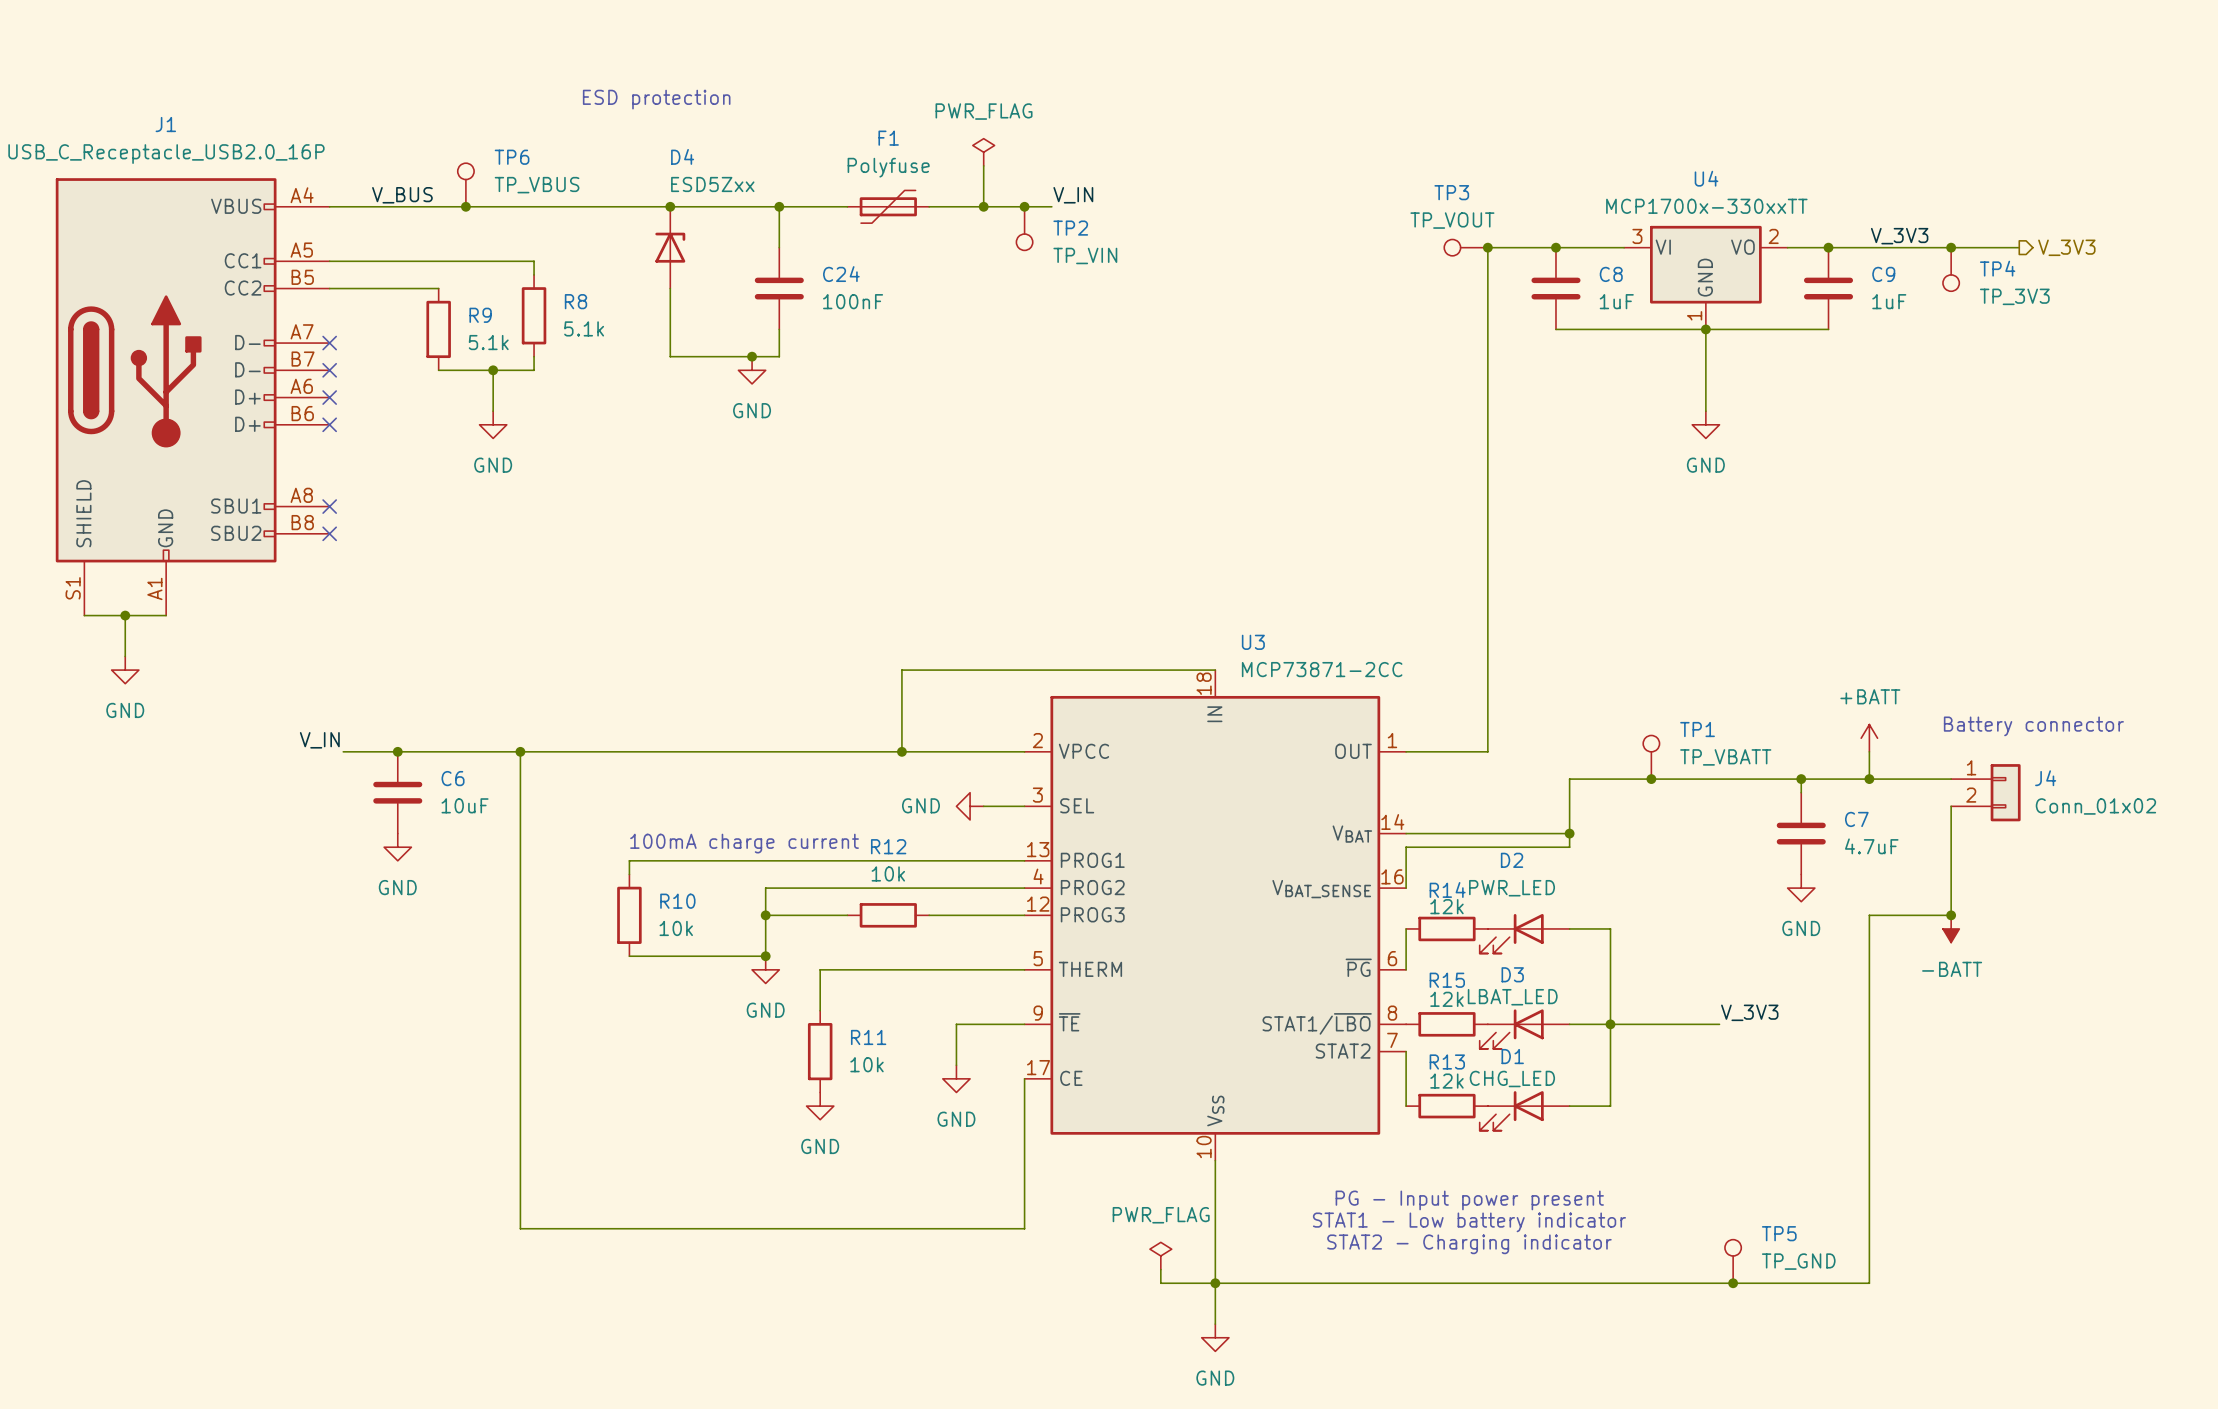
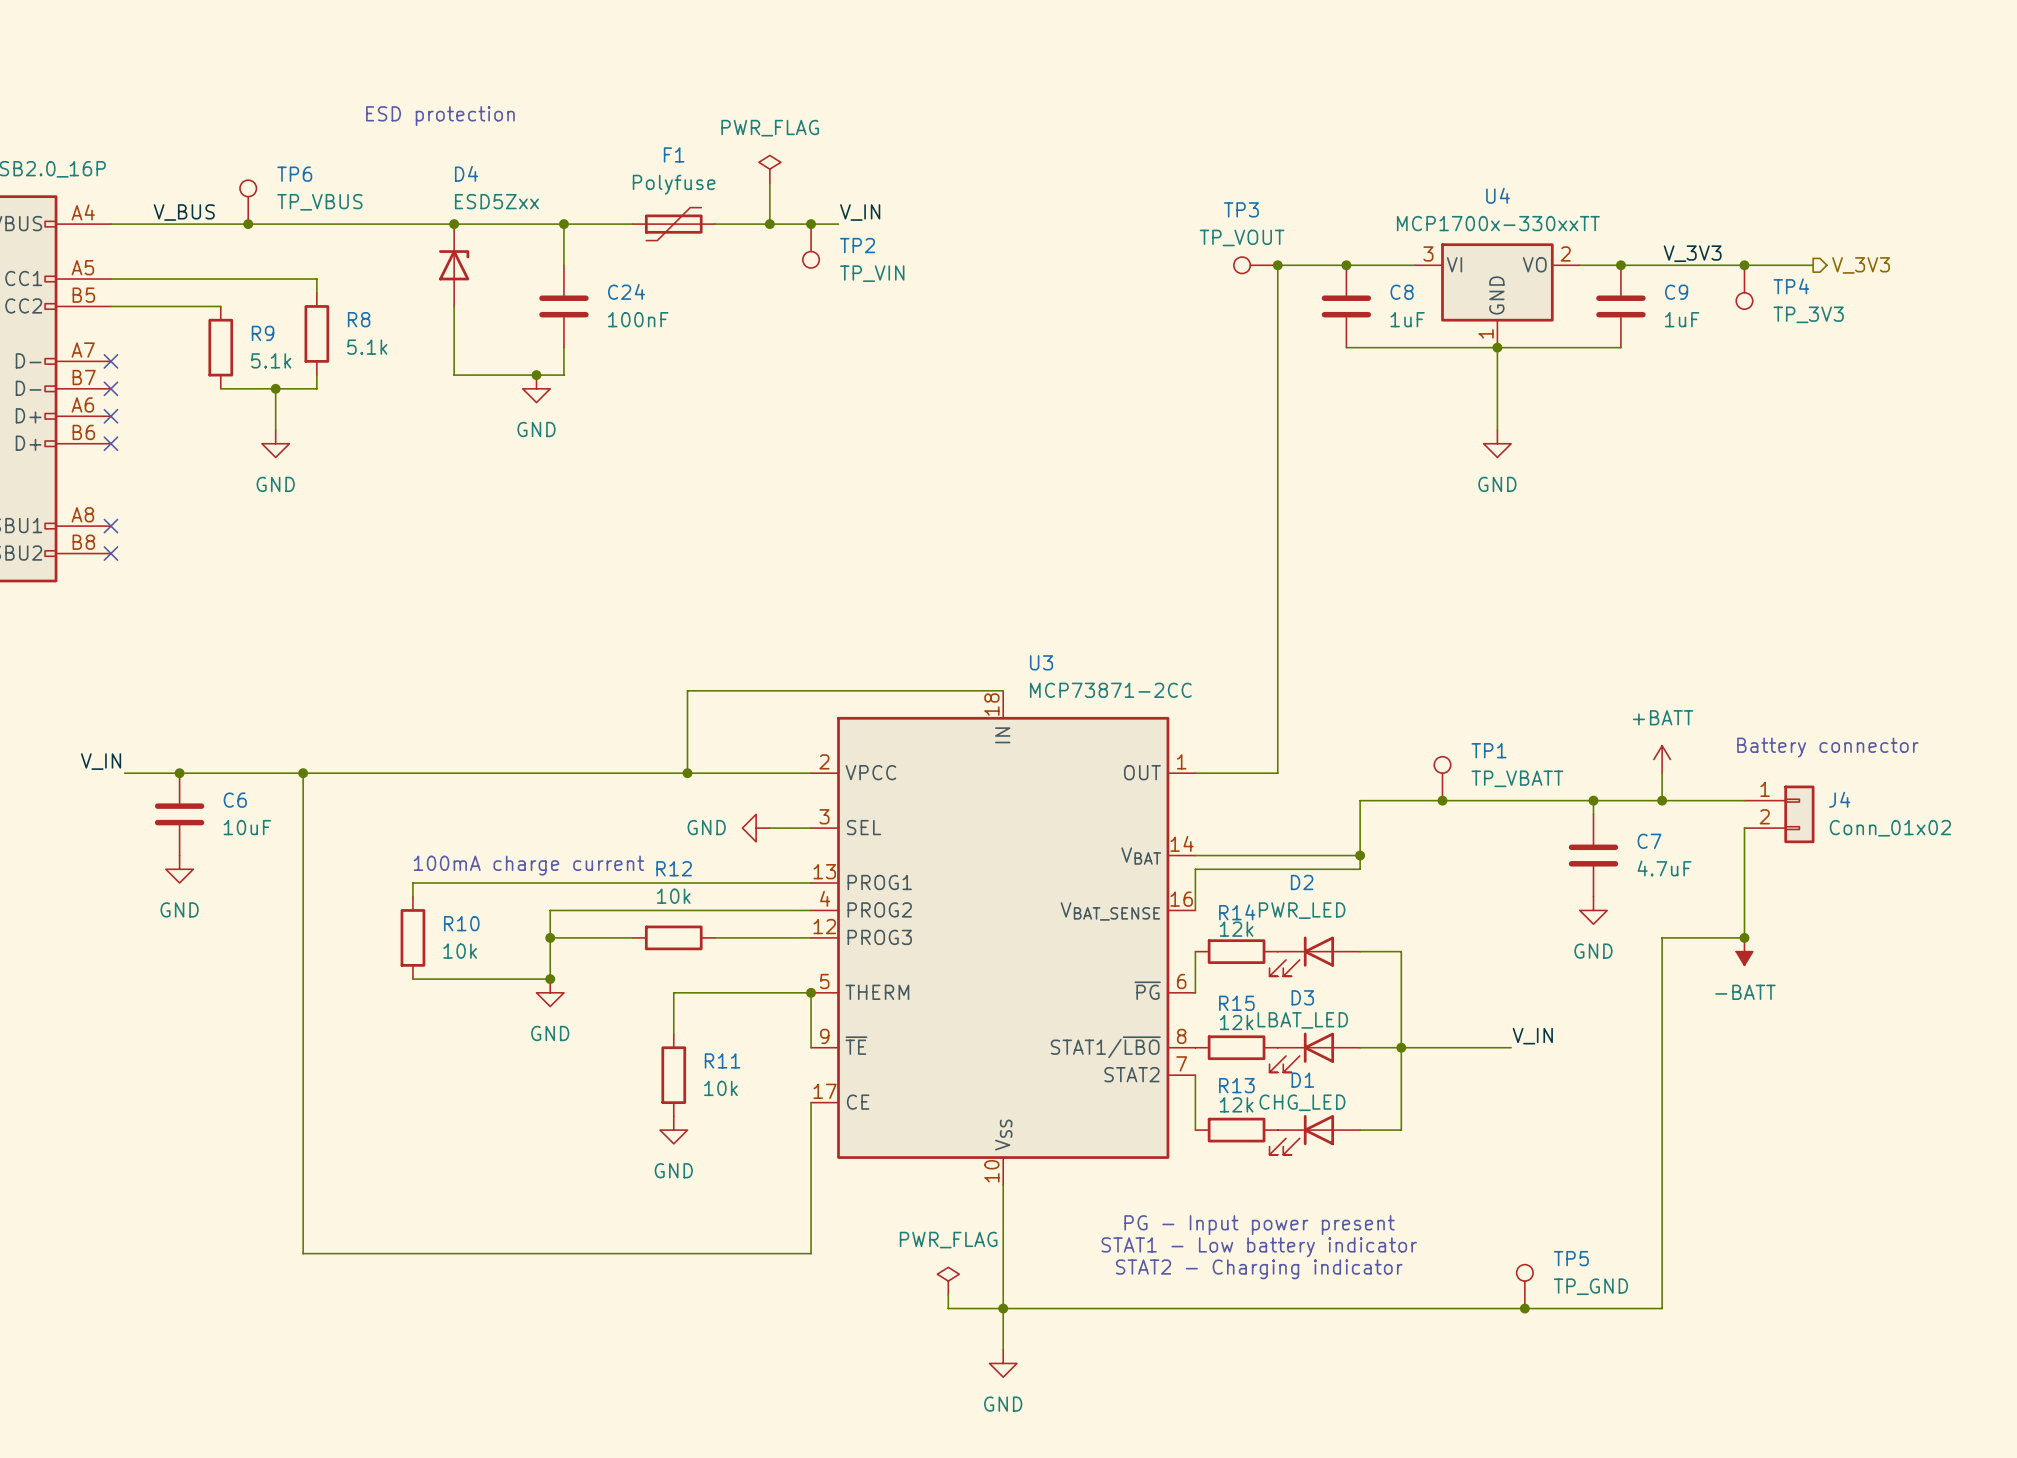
wire: (888, 969) (820, 969) (820, 1010) -> (673, 992) (673, 1034)
junction: none -> (811, 992)
label: V_3V3 (1749, 1012) -> V_IN (1532, 1036)
wire: (1024, 1024) (956, 1024) (956, 1065) -> (811, 1047) (811, 992)
R11 position: (820, 1051) -> (673, 1075)
power symbol: GND (956, 1078) -> none
power symbol: GND (820, 1106) -> none
power symbol: none -> GND (673, 1130)

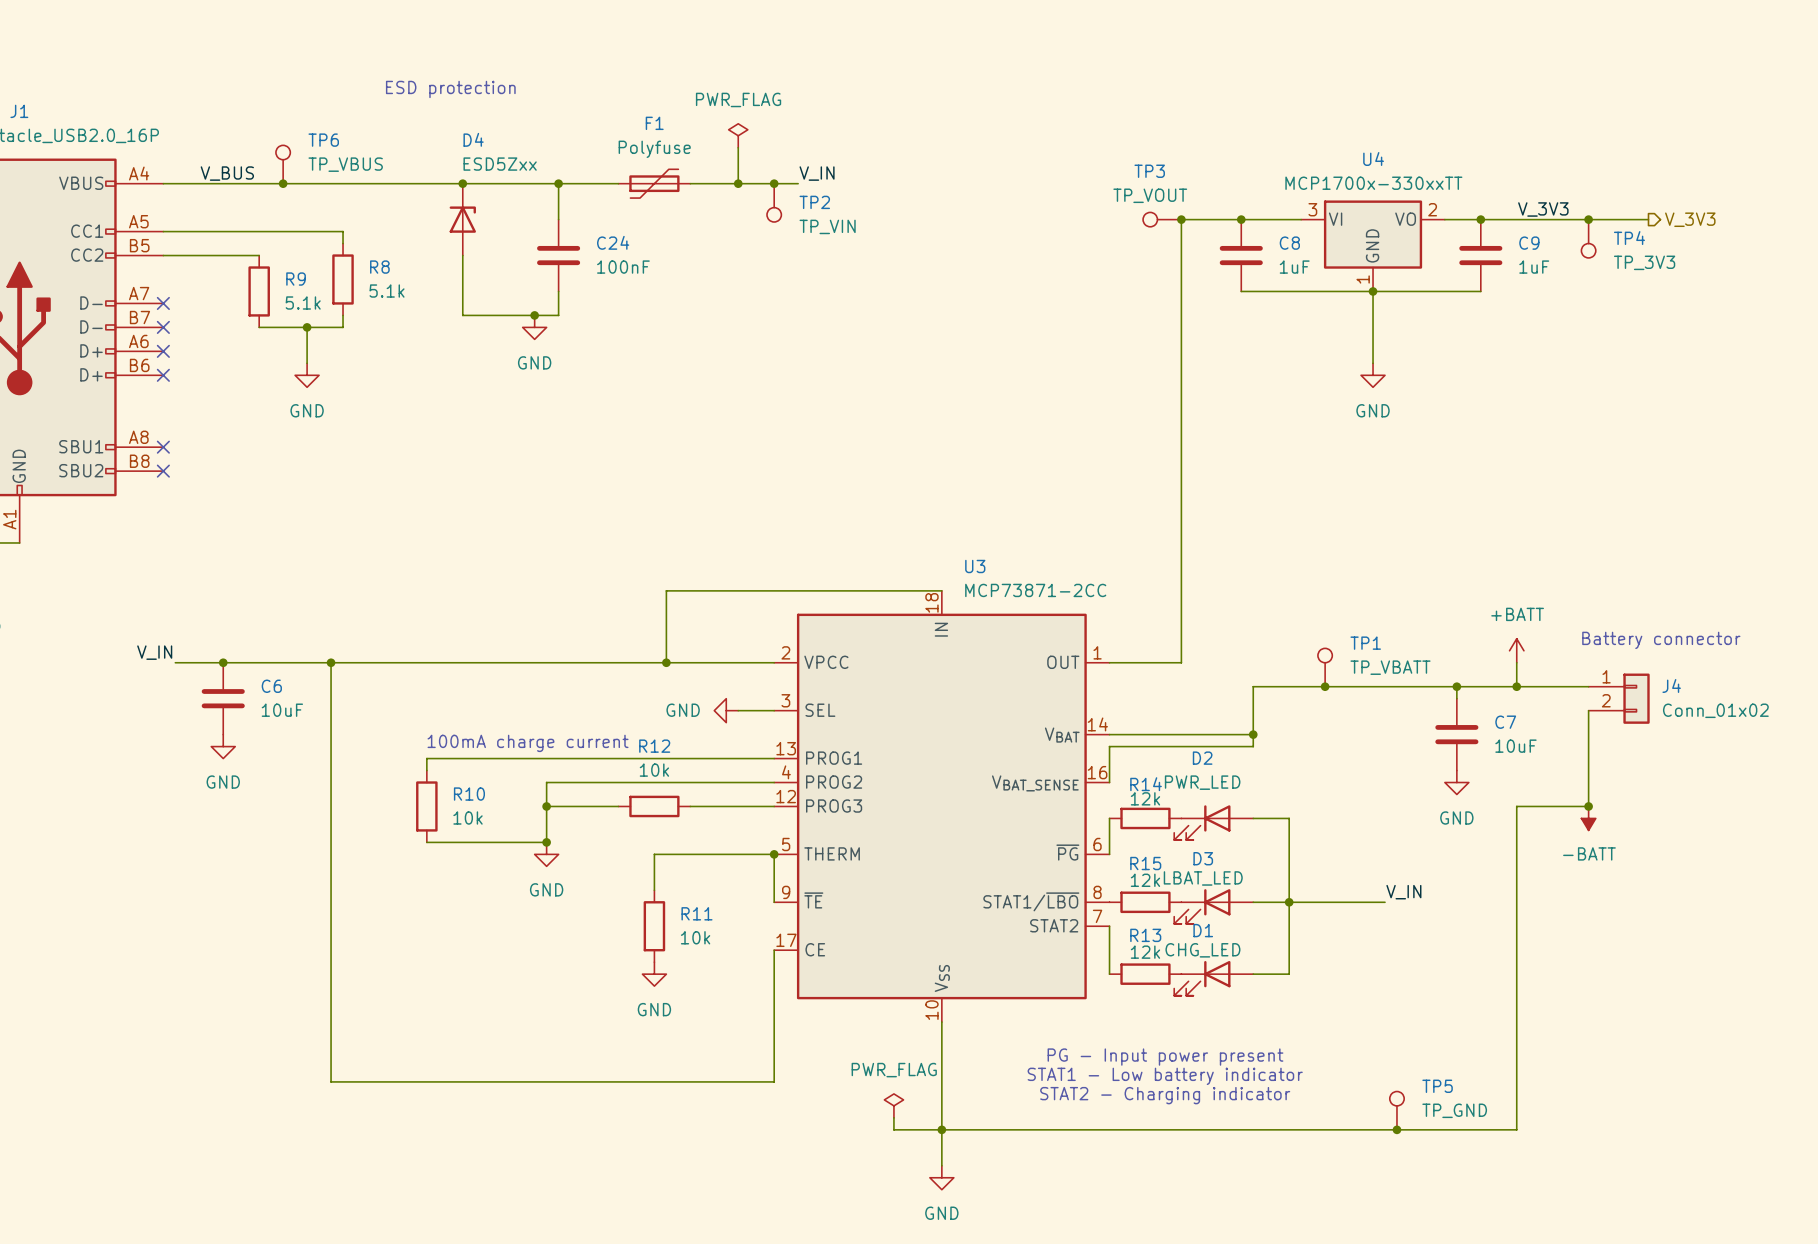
C7 value: 4.7uF (1664, 868) -> 10uF (1515, 746)

